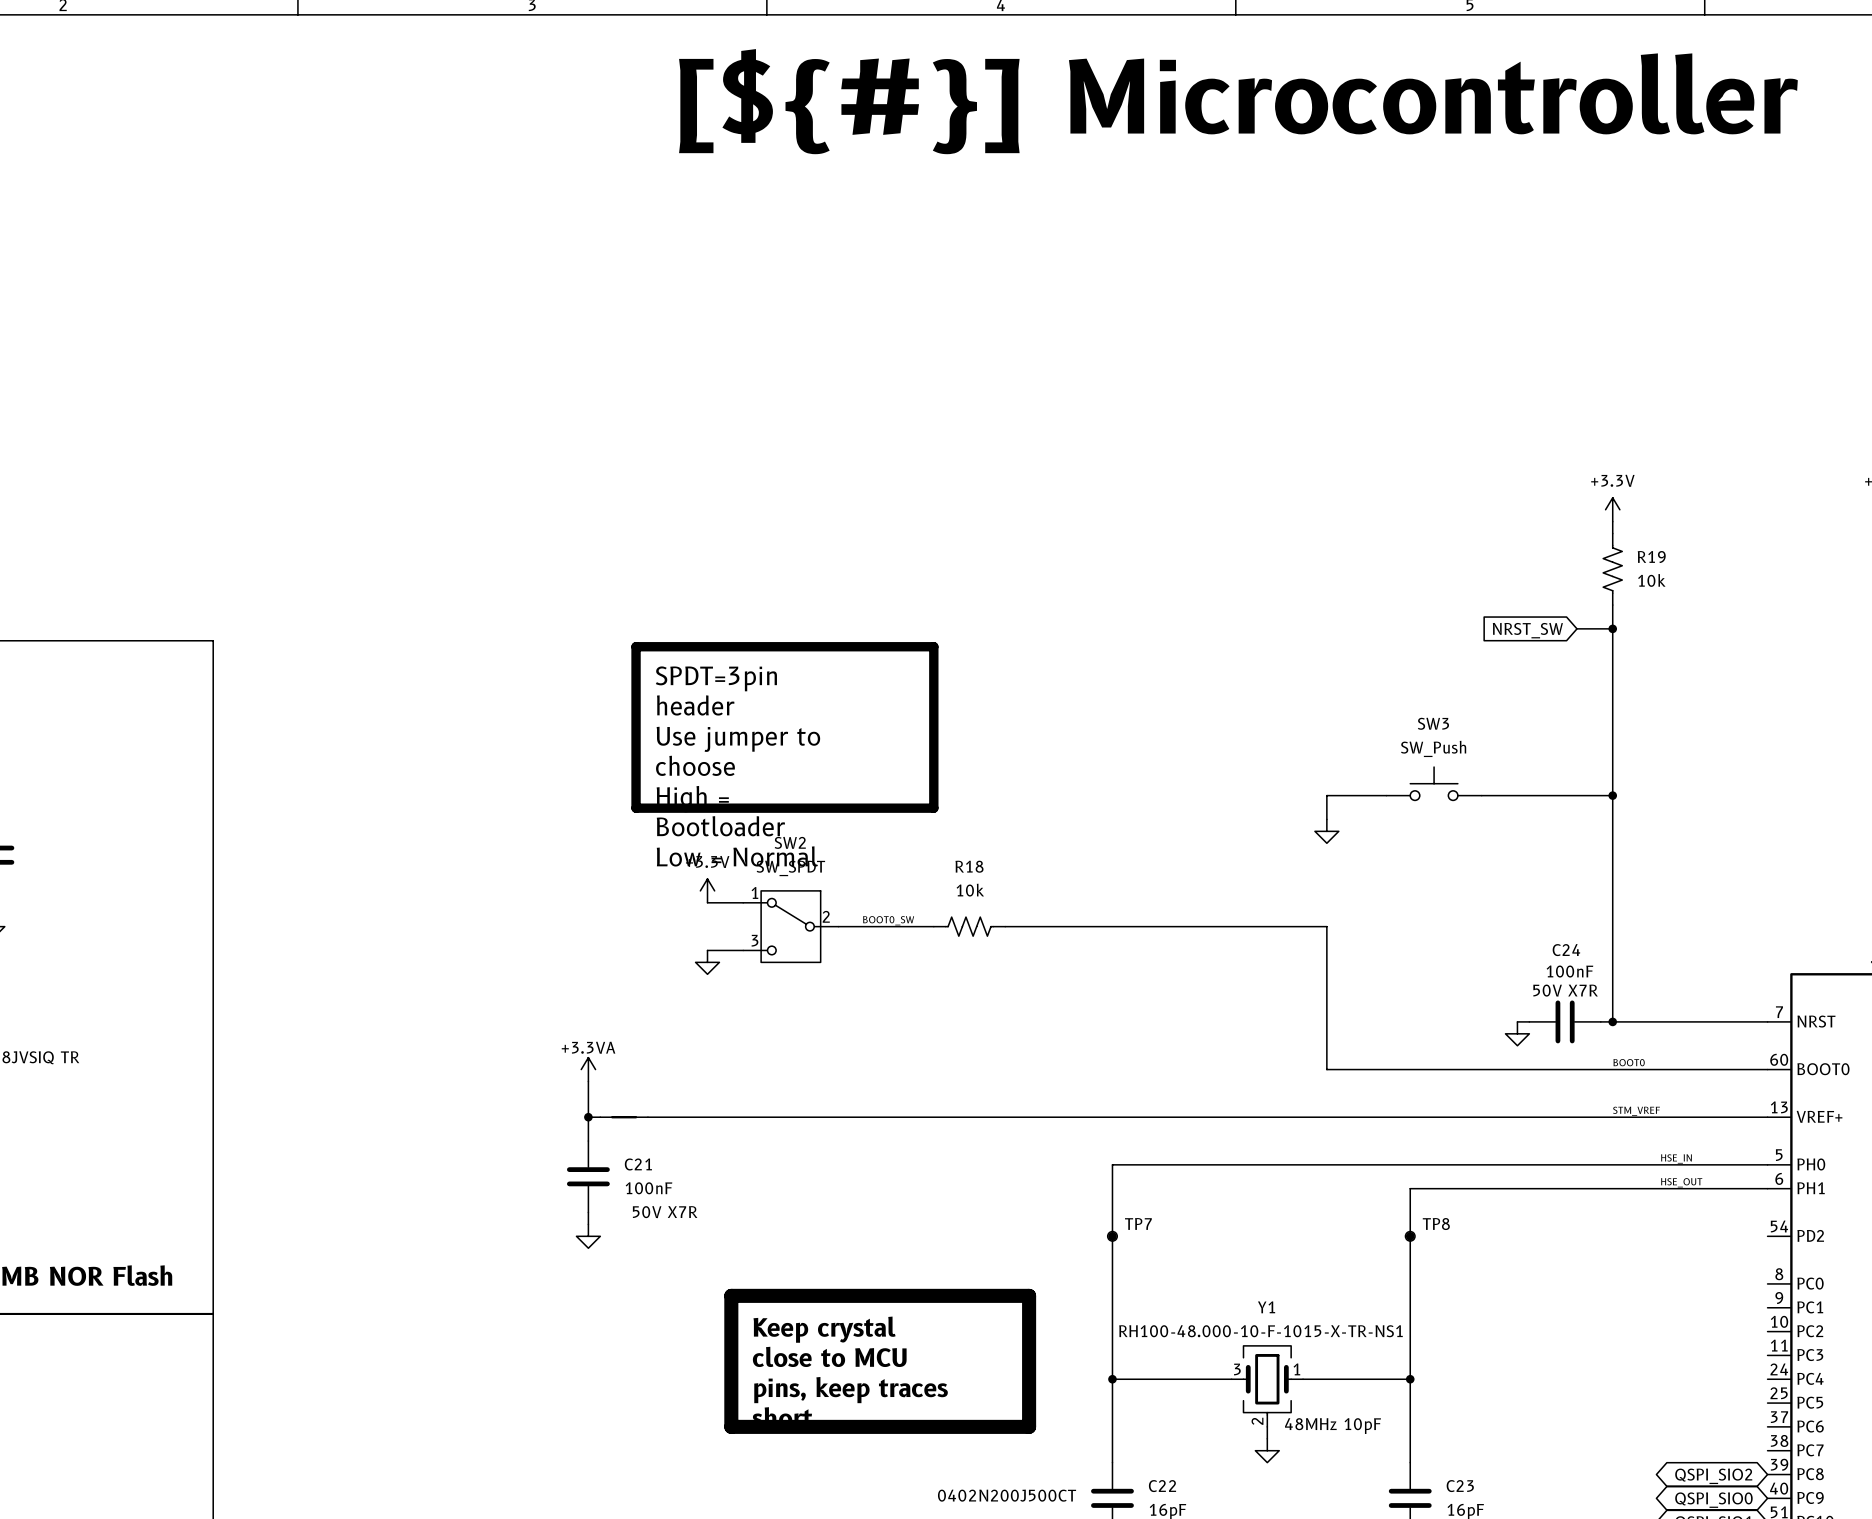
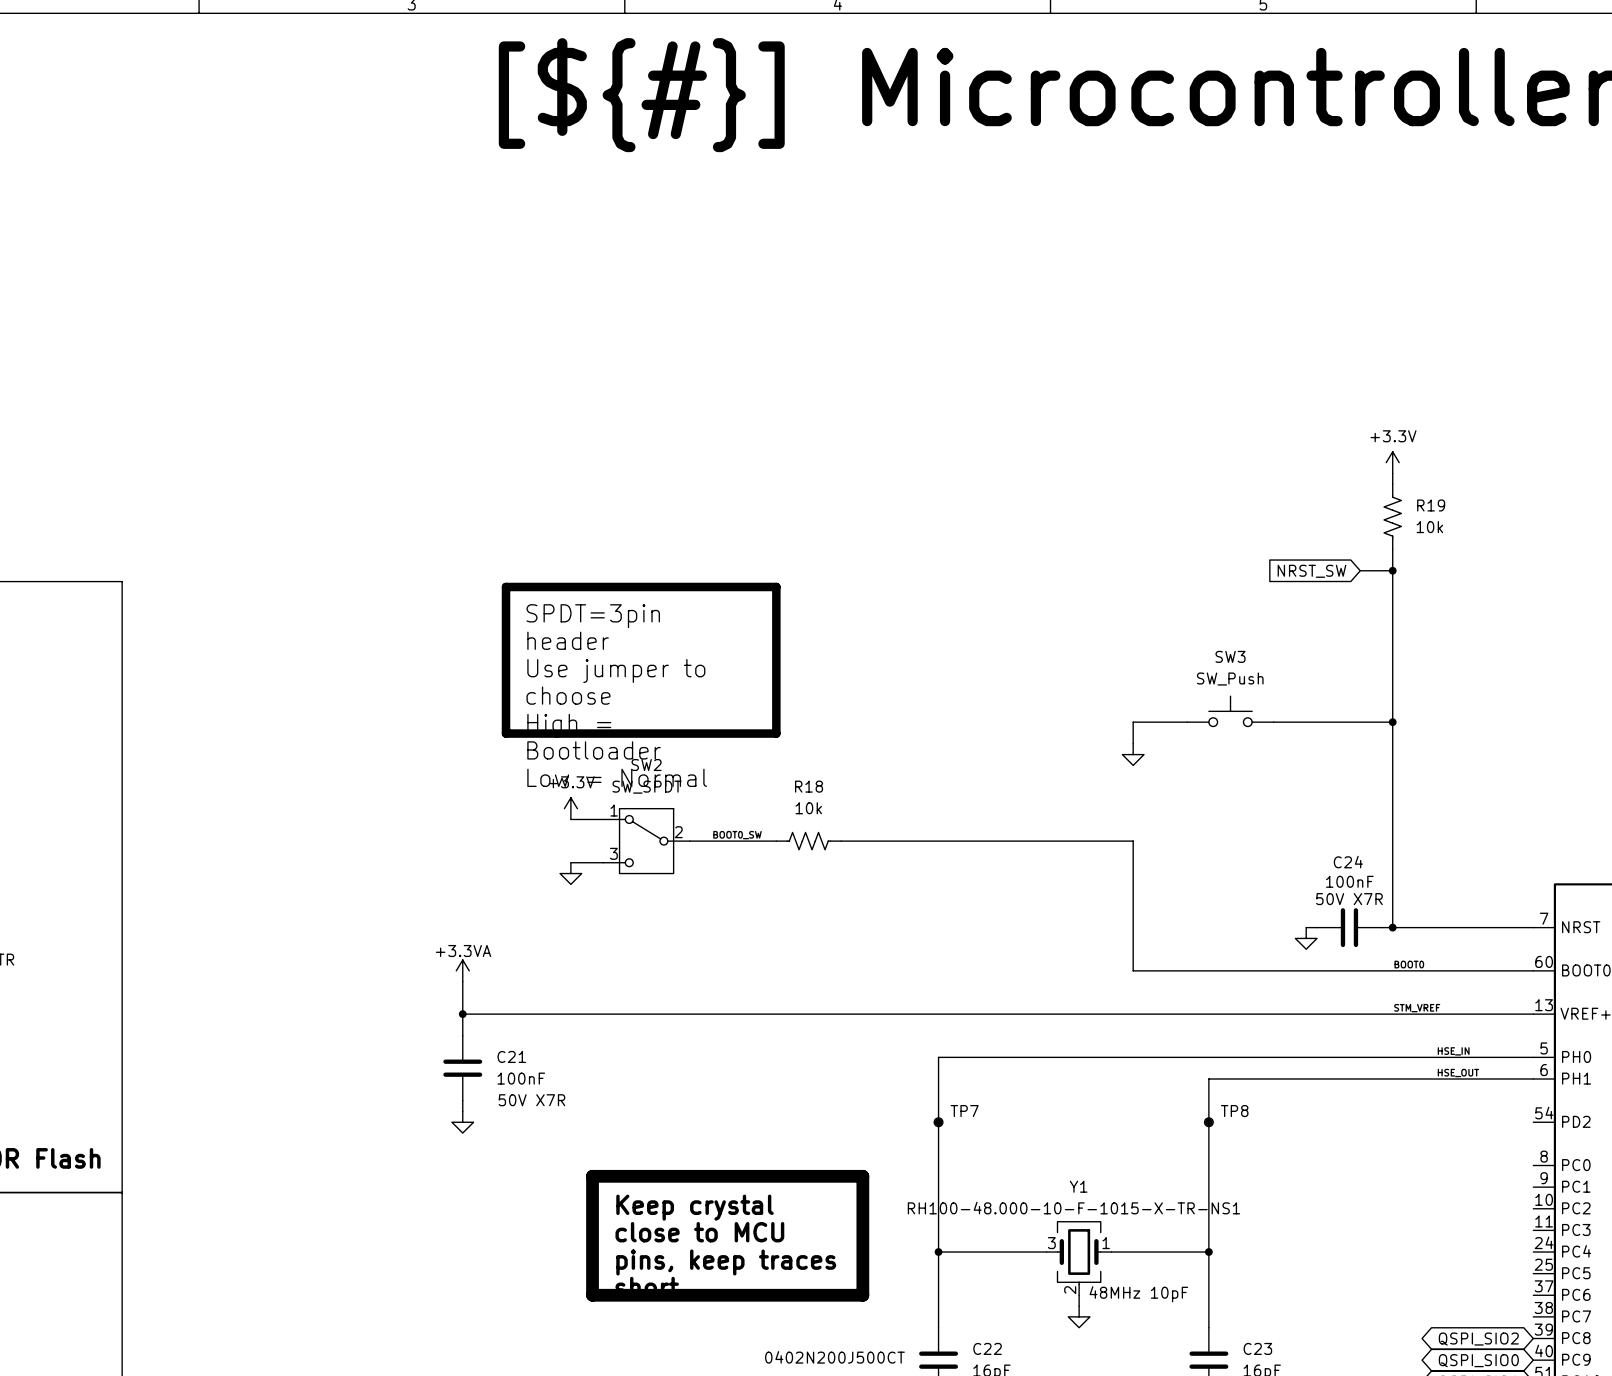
part: (624, 1117) -> none

